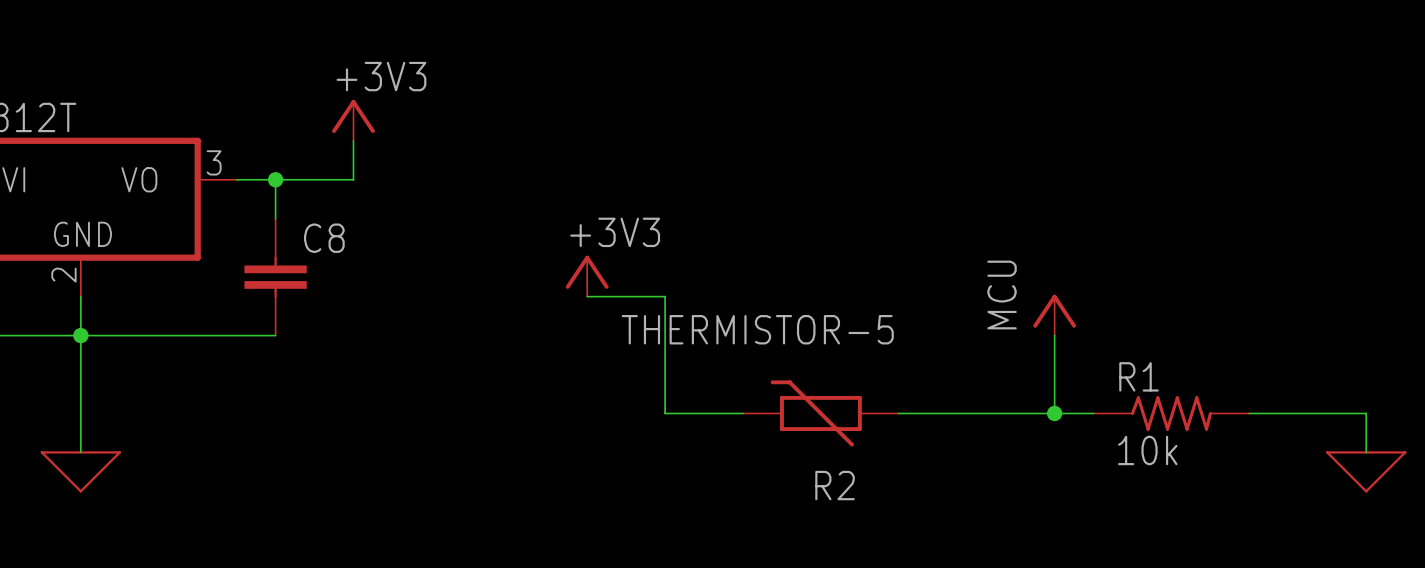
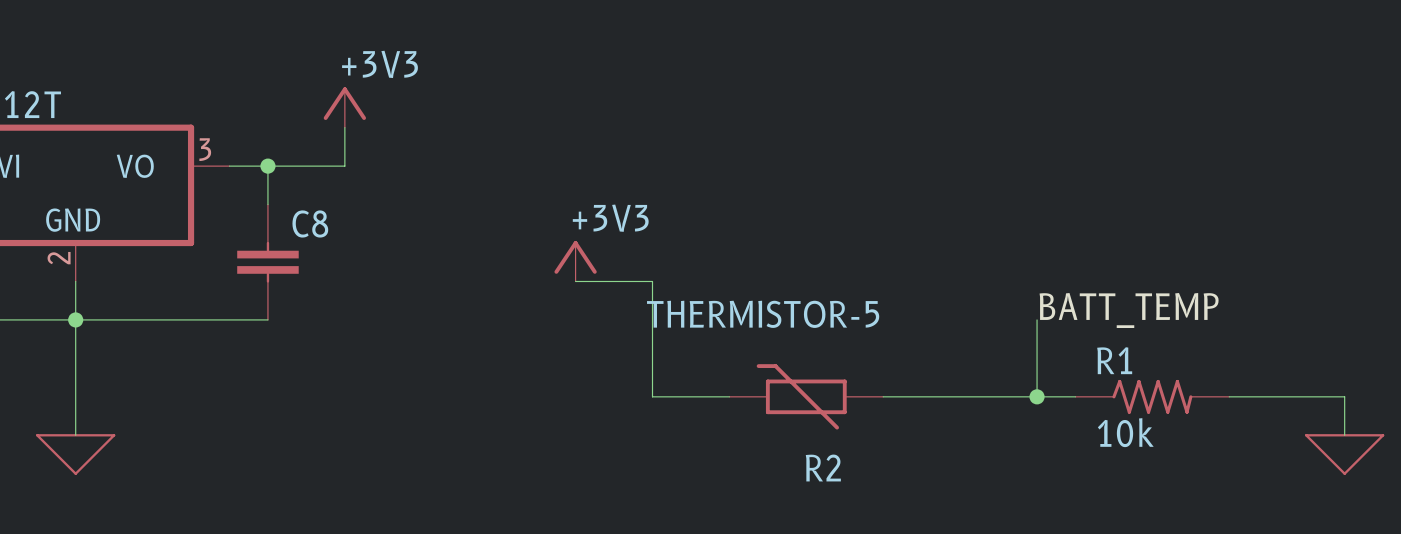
power symbol: MCU (1054, 315) -> none
label: none -> BATT_TEMP (1129, 310)

